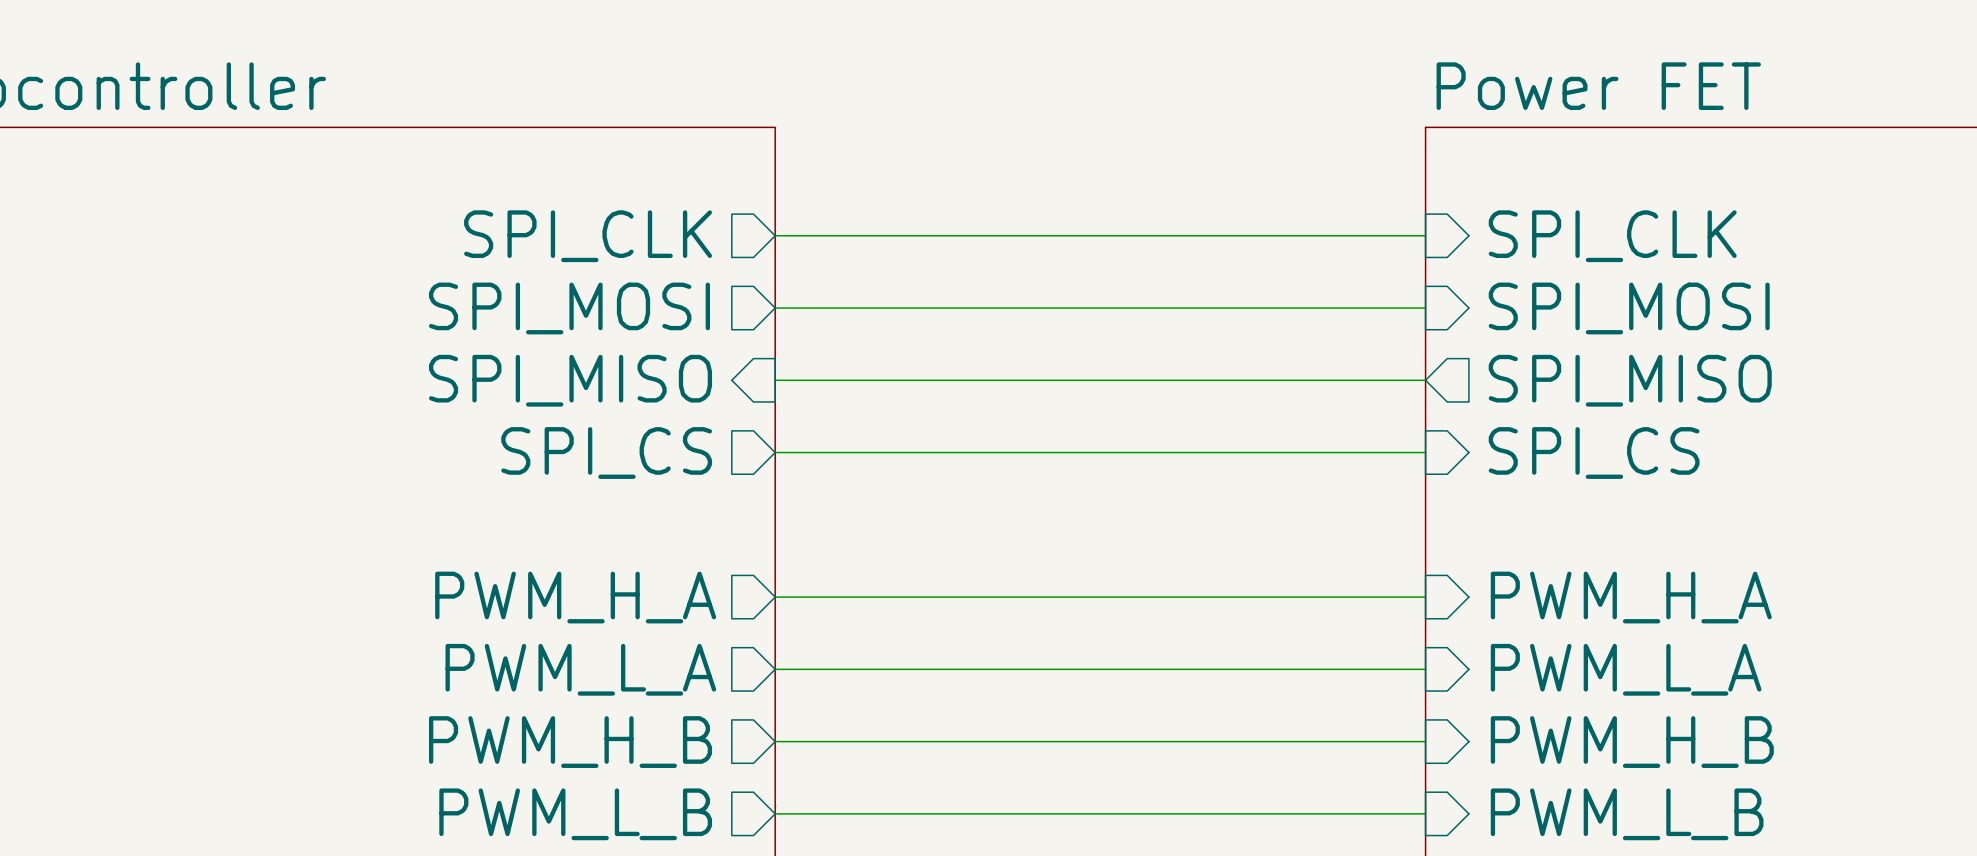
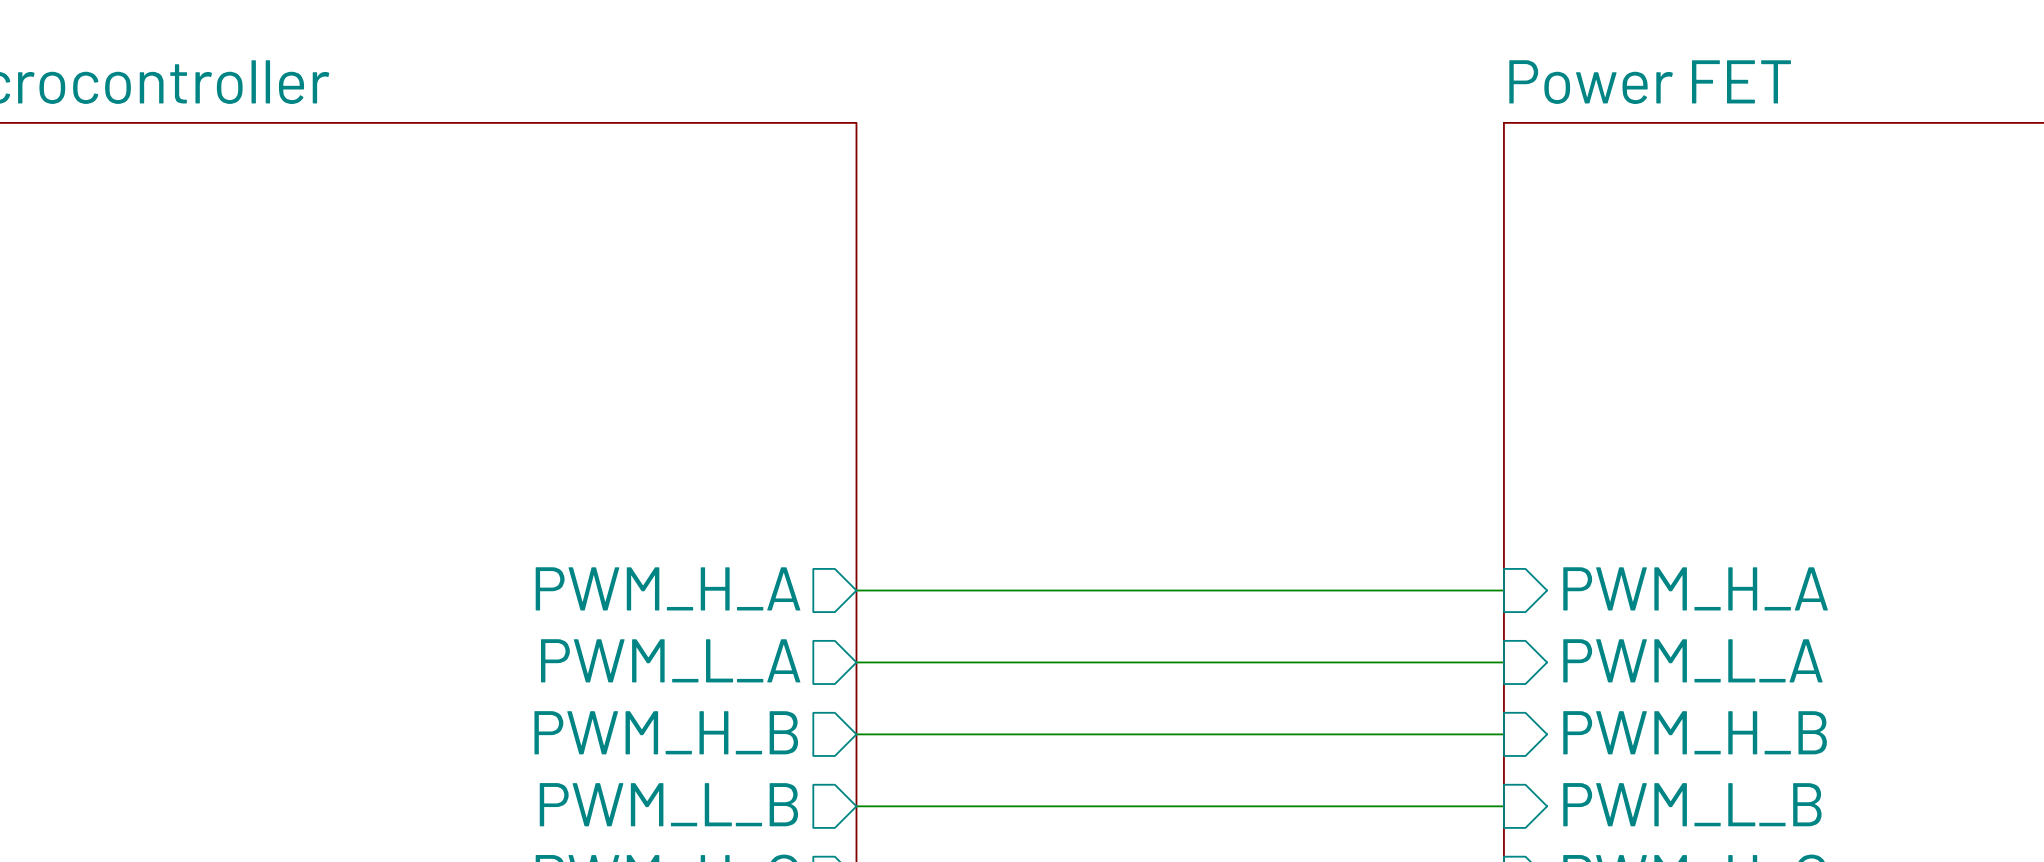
wire: (775, 235) (1425, 235) -> none
sheet pin: SPI_CLK (588, 236) -> none
sheet pin: SPI_CLK (1612, 236) -> none
sheet pin: SPI_MOSI (569, 308) -> none
wire: (775, 308) (1425, 308) -> none
sheet pin: SPI_MOSI (1629, 308) -> none
sheet pin: SPI_MISO (570, 380) -> none
wire: (775, 380) (1425, 380) -> none
sheet pin: SPI_MISO (1630, 380) -> none
wire: (775, 452) (1425, 452) -> none
sheet pin: SPI_CS (606, 453) -> none
sheet pin: SPI_CS (1594, 453) -> none

